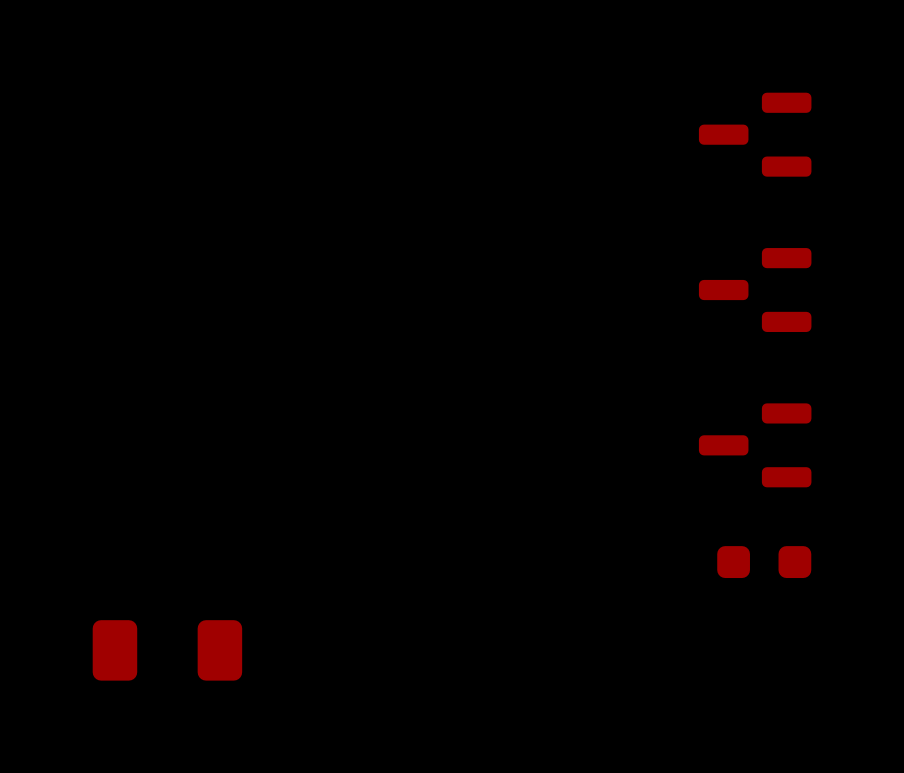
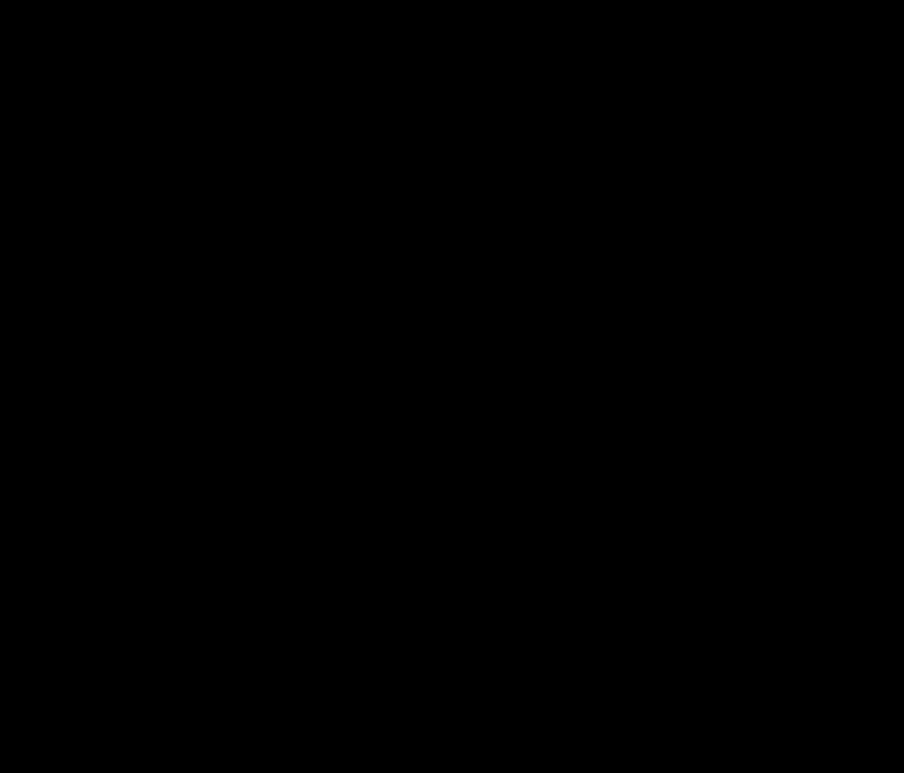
part: (755, 134) -> none
part: (755, 290) -> none
part: (755, 445) -> none
part: (764, 562) -> none
part: (167, 650) -> none

